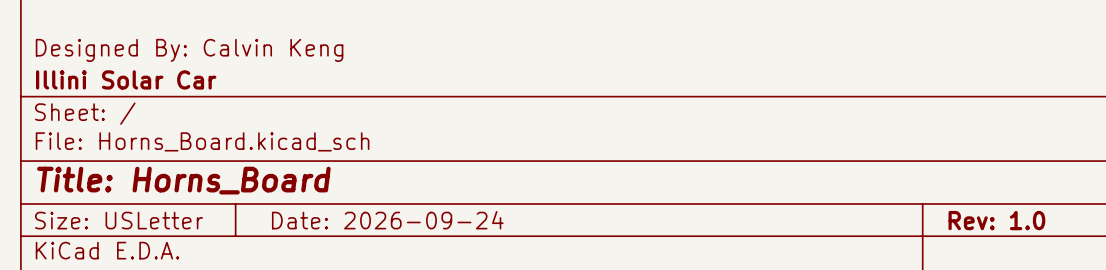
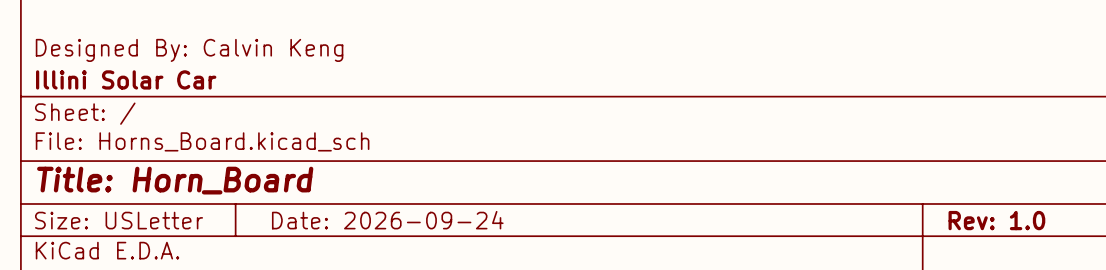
title block: Title: Horns_Board (183, 180) -> Title: Horn_Board (175, 180)

